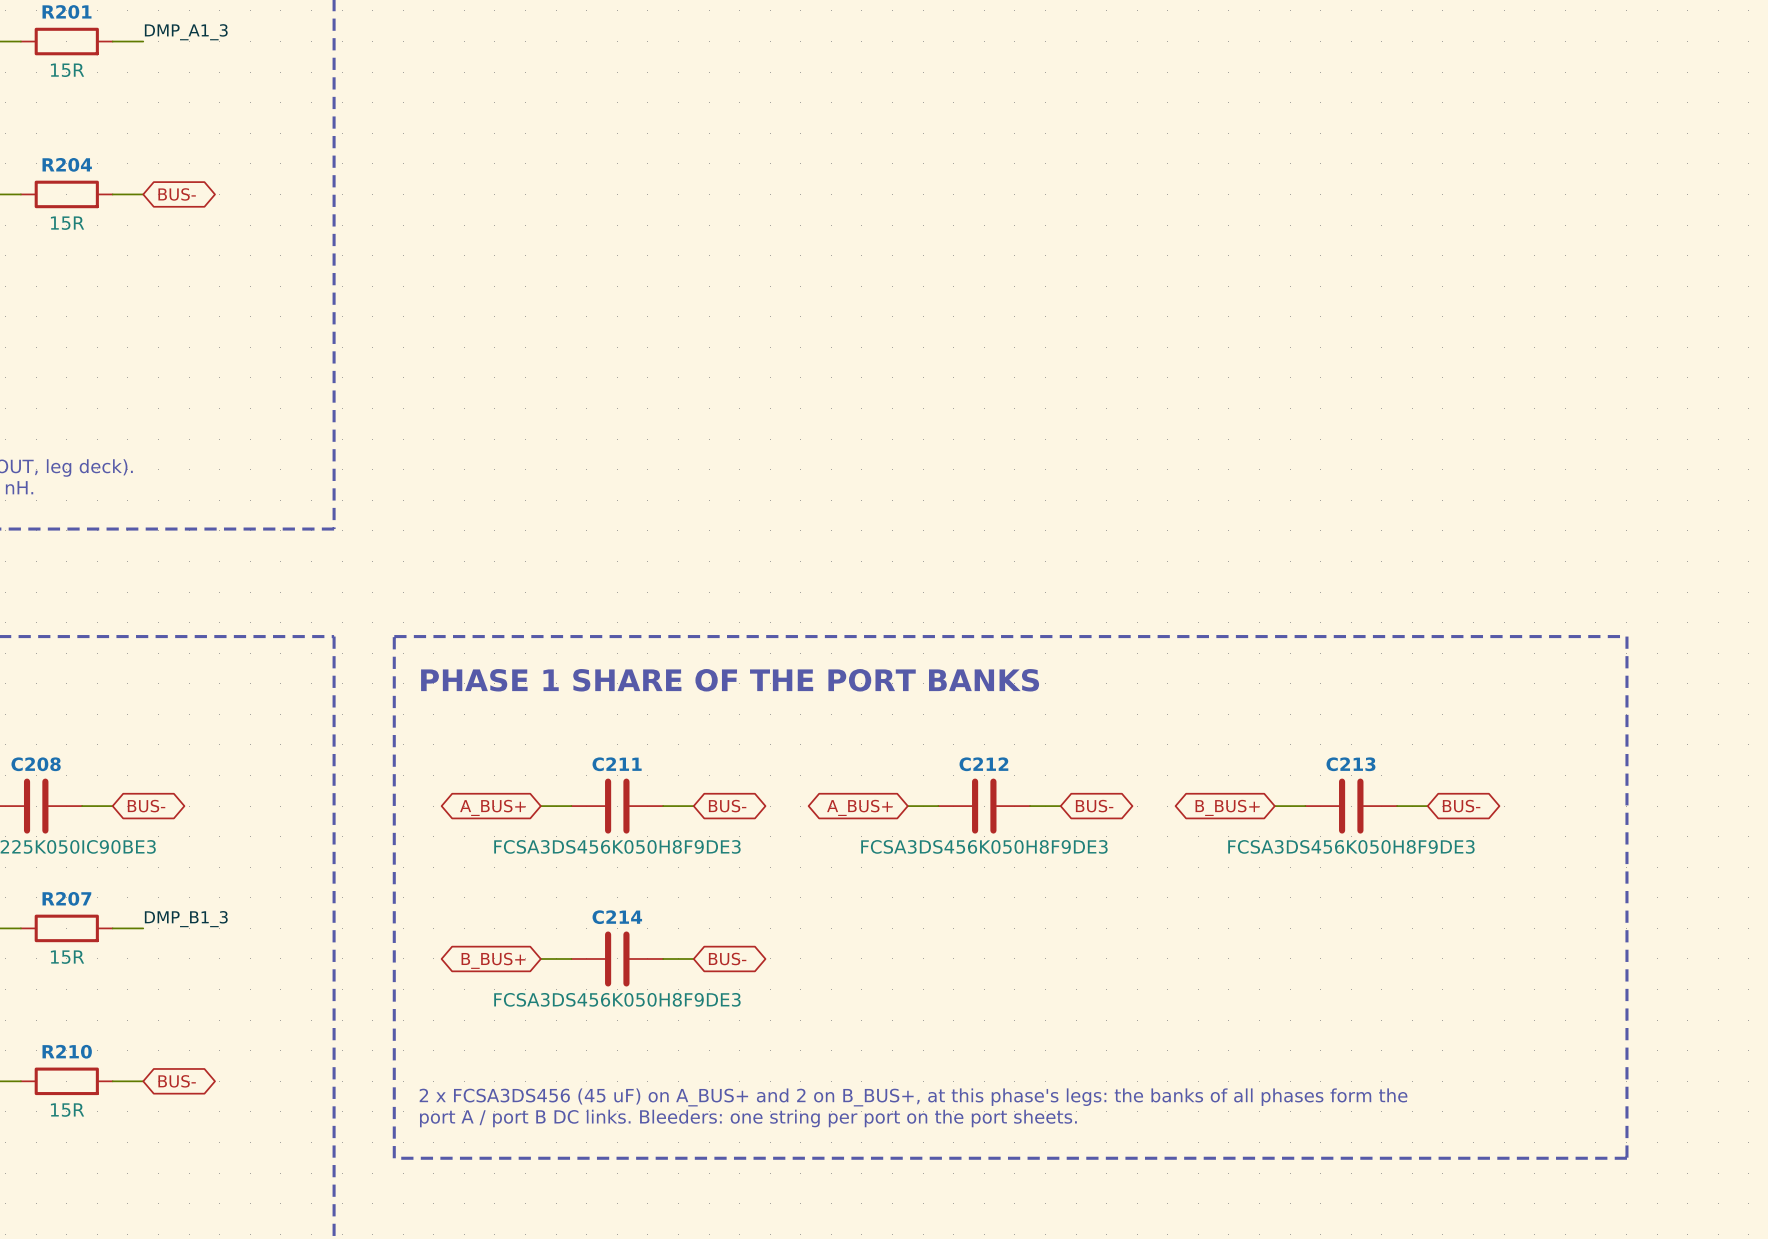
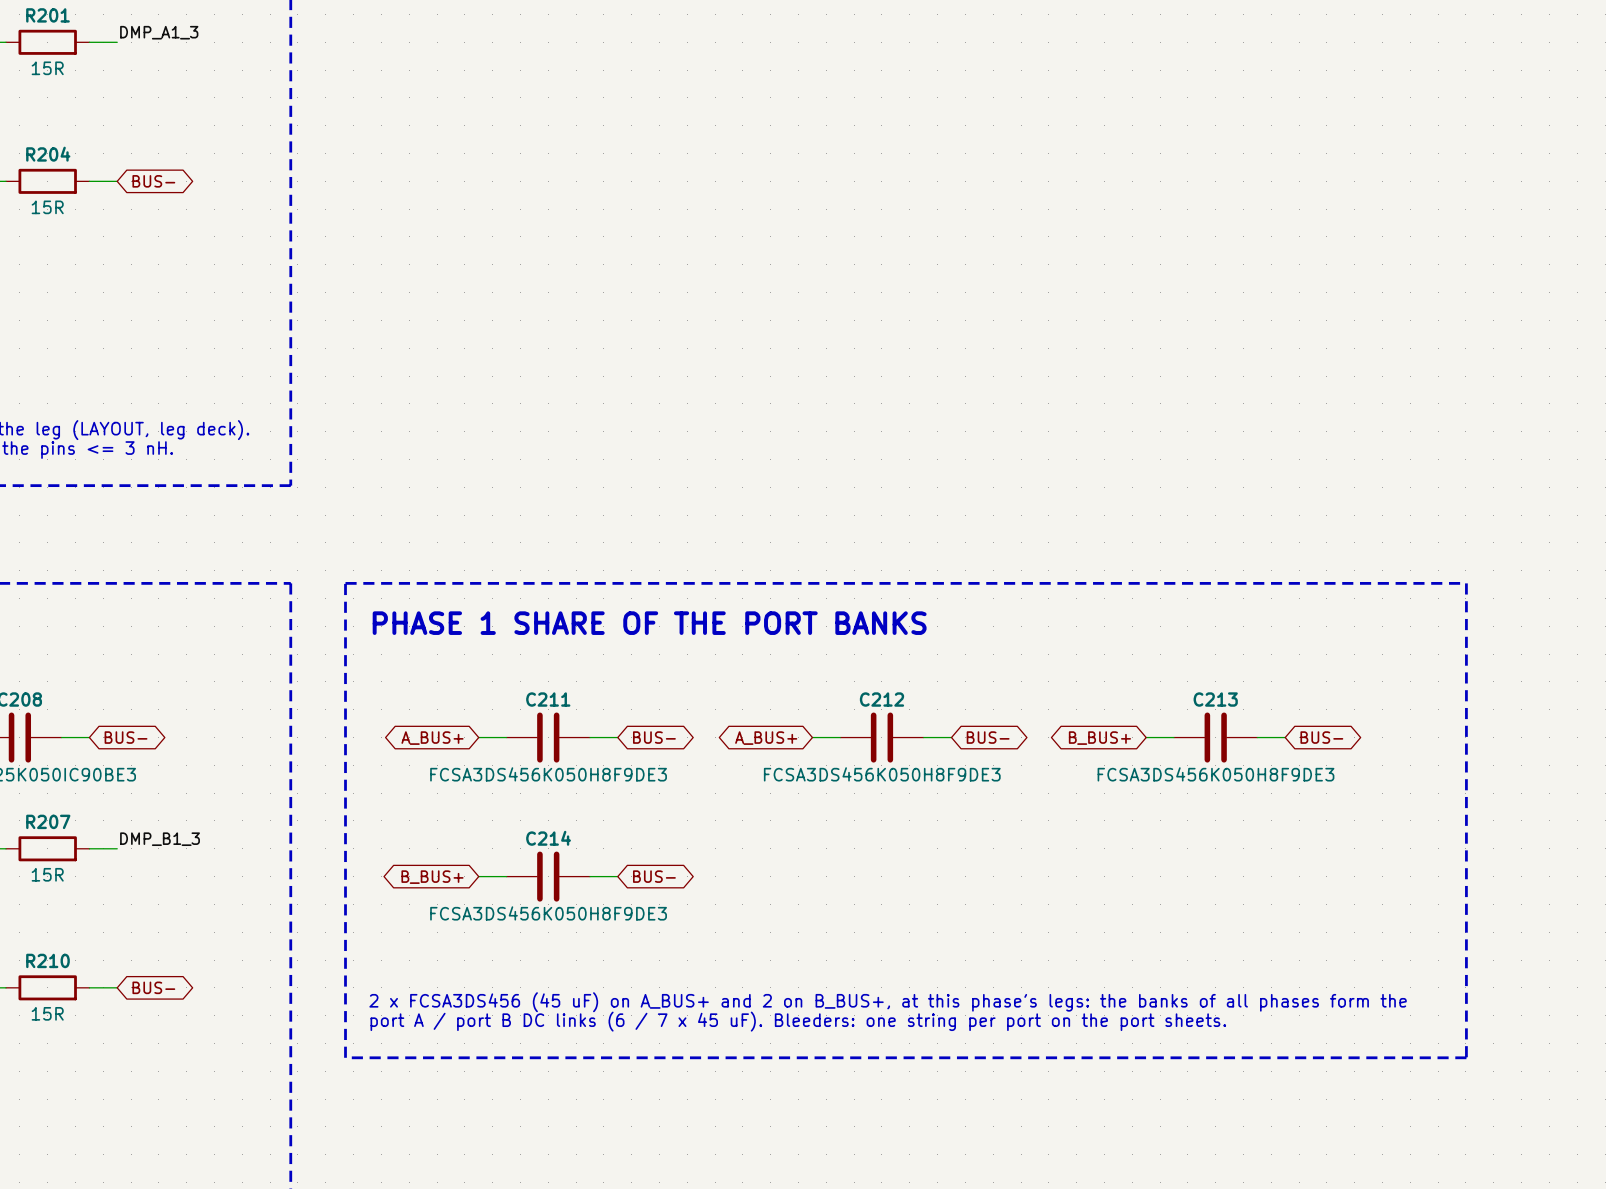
text: port A / port B DC links. Bleeders: one string per port on the port sheets. (748, 1118) -> port A / port B DC links (6 / 7 x 45 uF). Bleeders: one string per port on the port sheets. (798, 1021)

